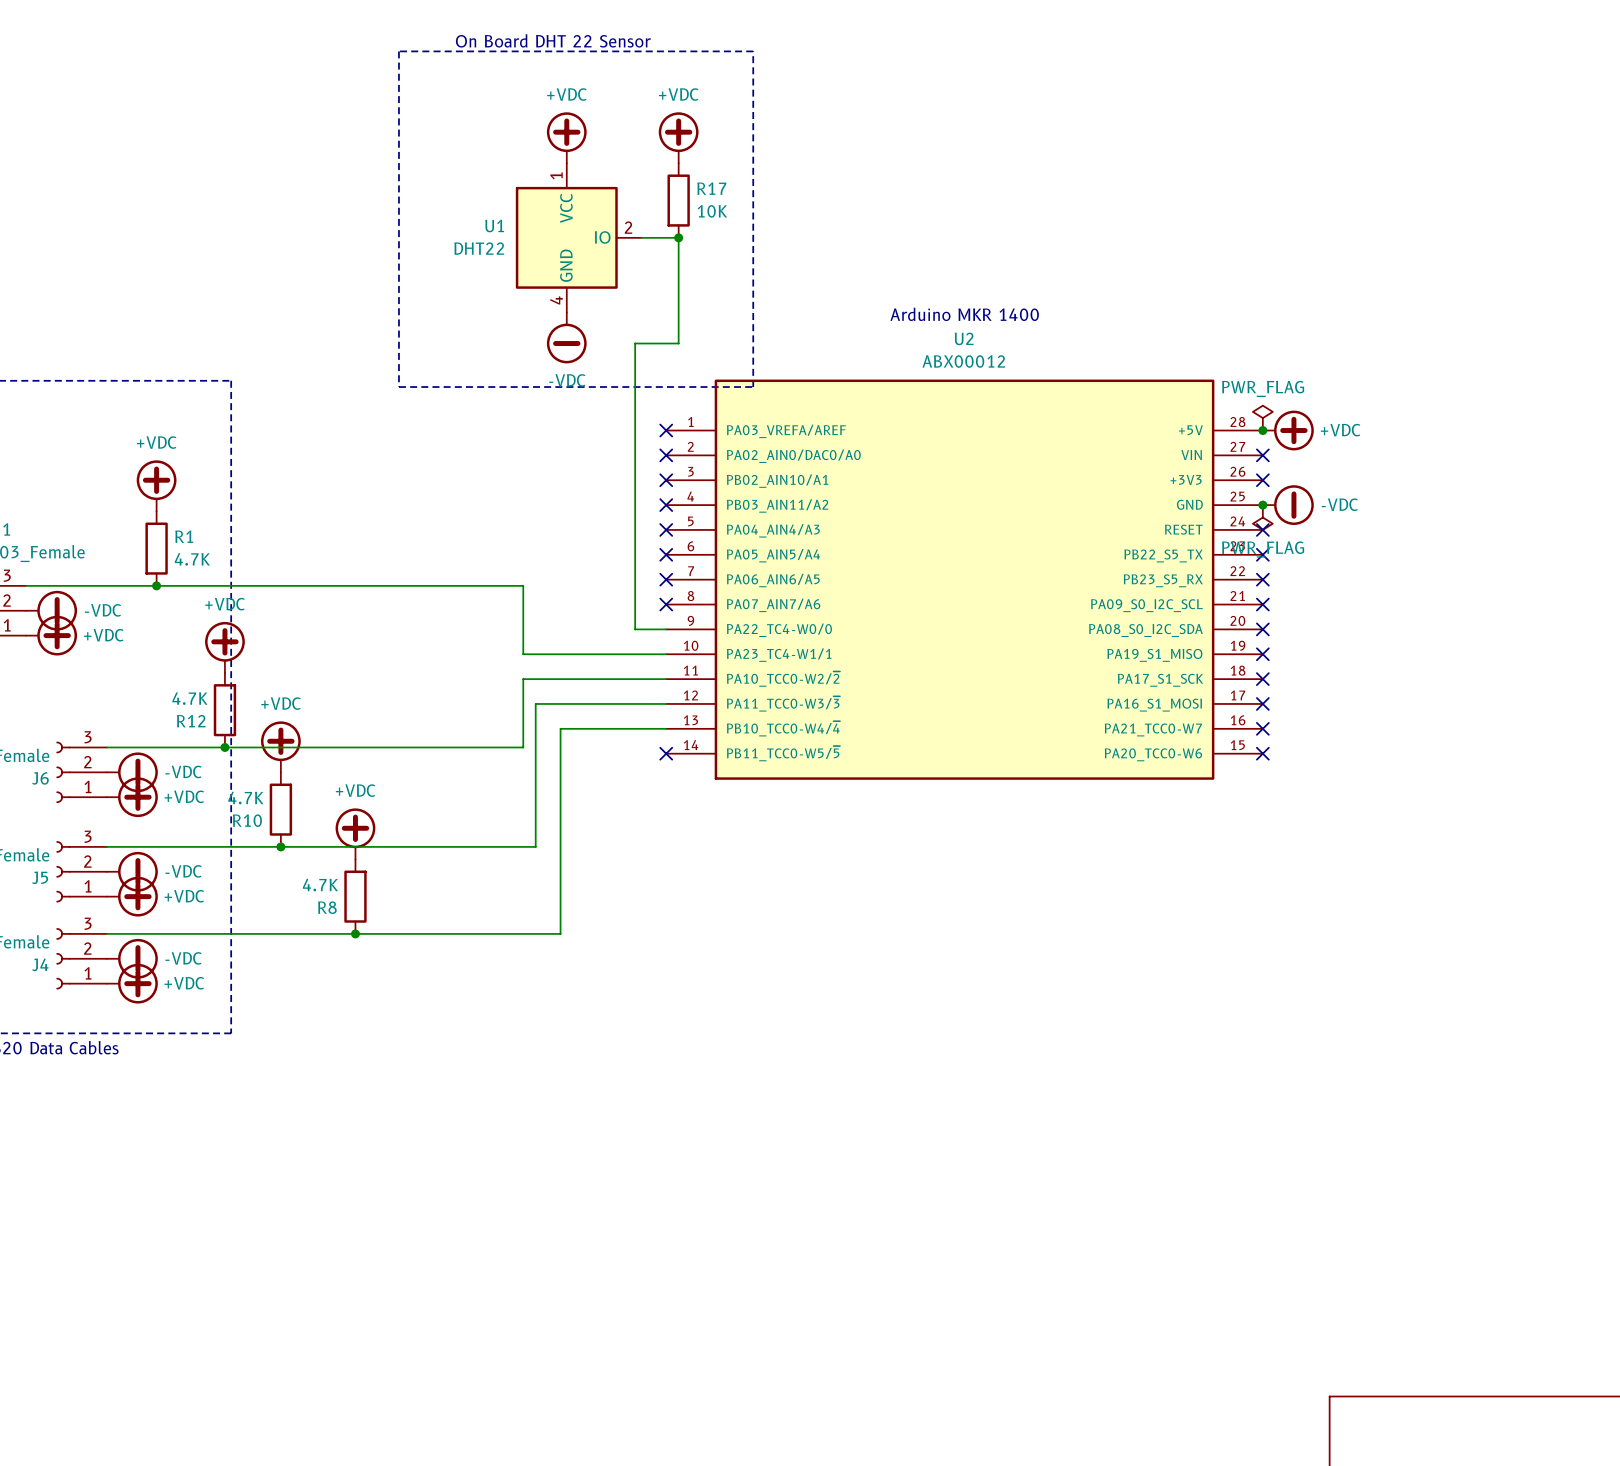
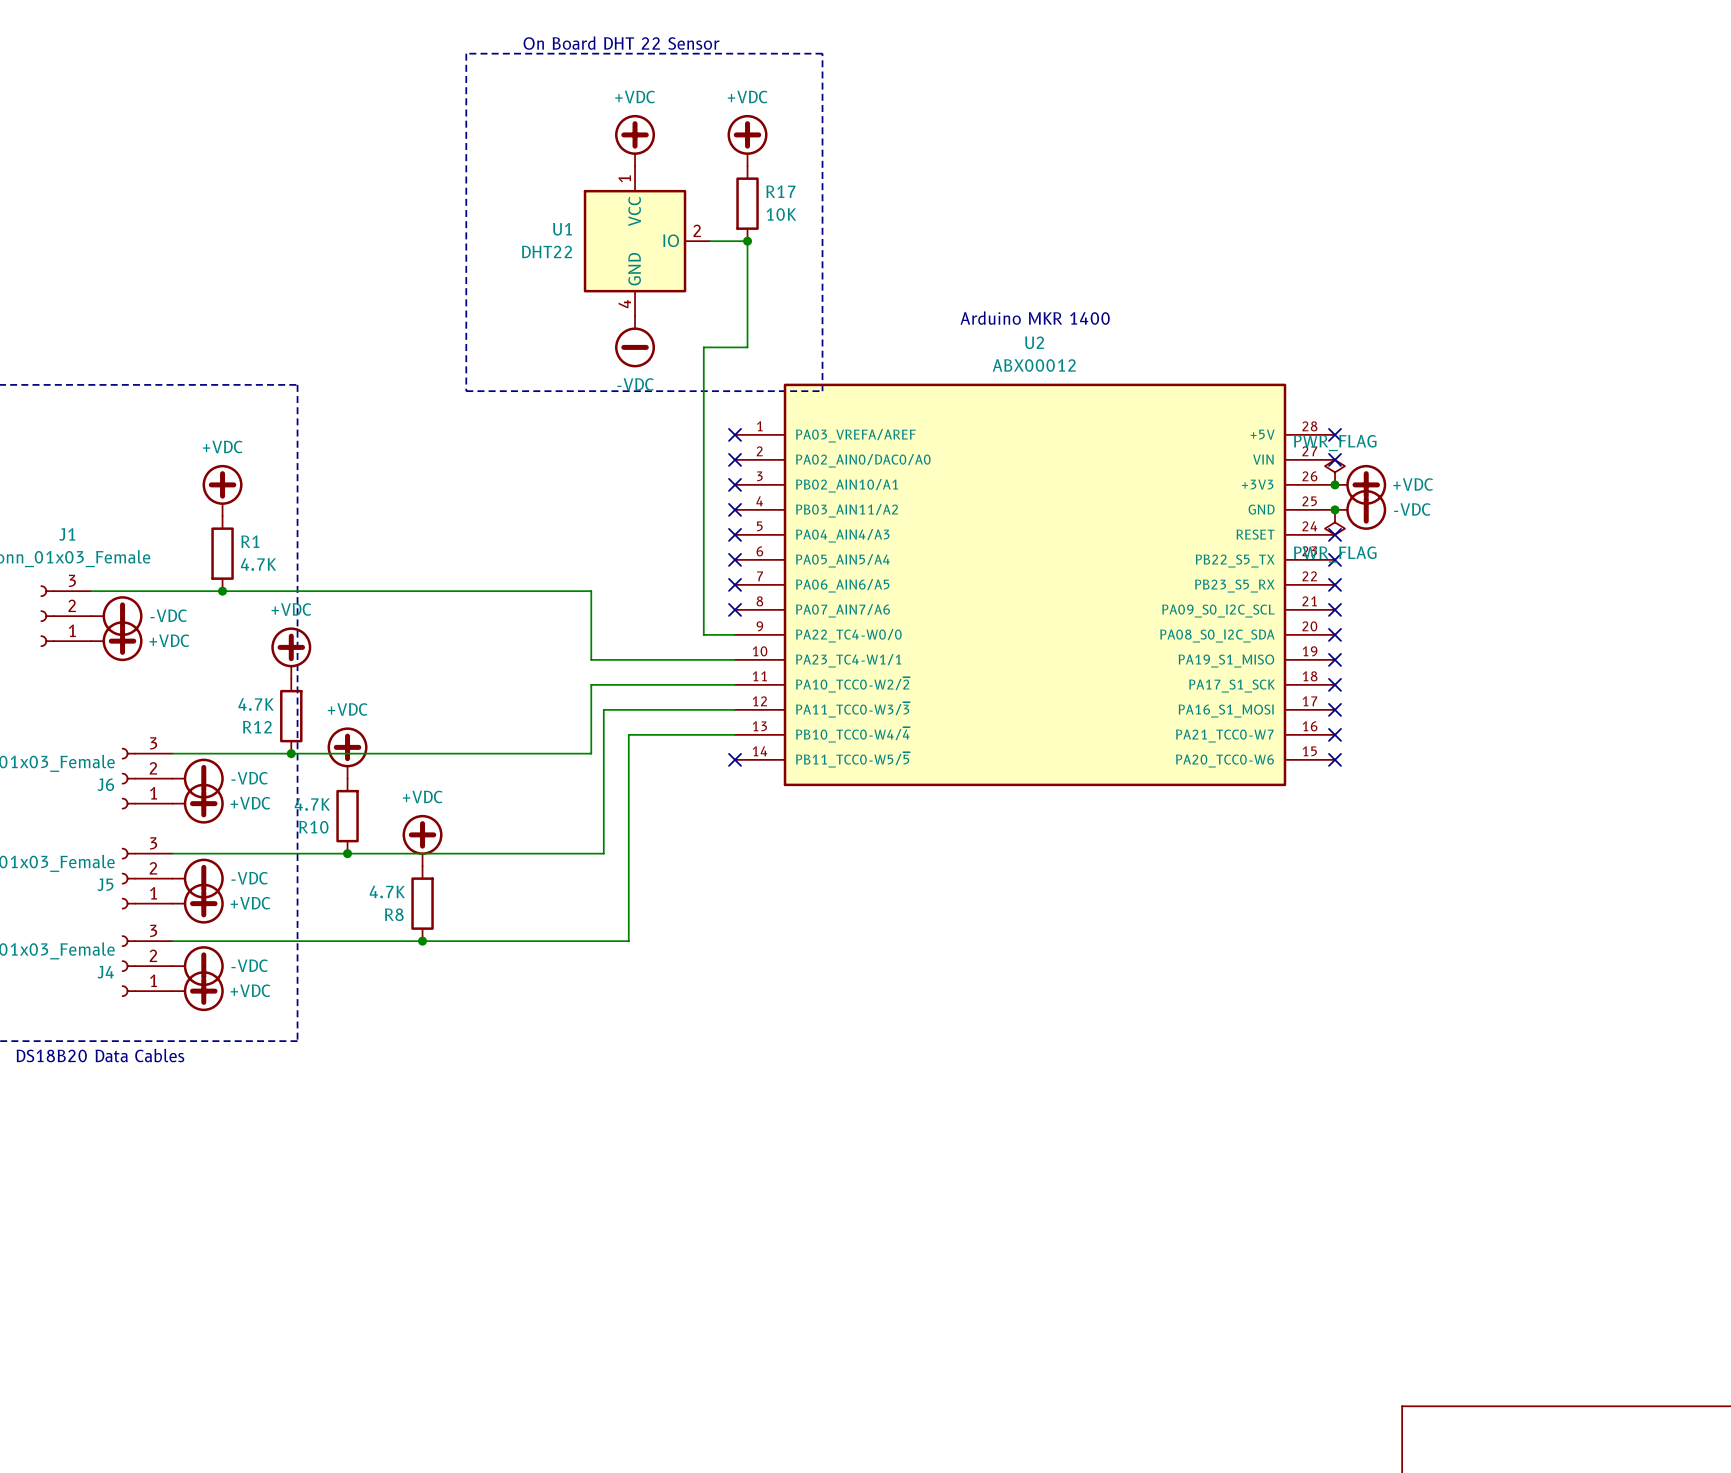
power symbol position: PWR_FLAG (1262, 418) -> PWR_FLAG (1334, 472)
junction position: (1262, 430) -> (1334, 484)
power symbol position: +VDC (1288, 430) -> +VDC (1360, 484)
no-connect mark position: (1262, 480) -> (1334, 434)

